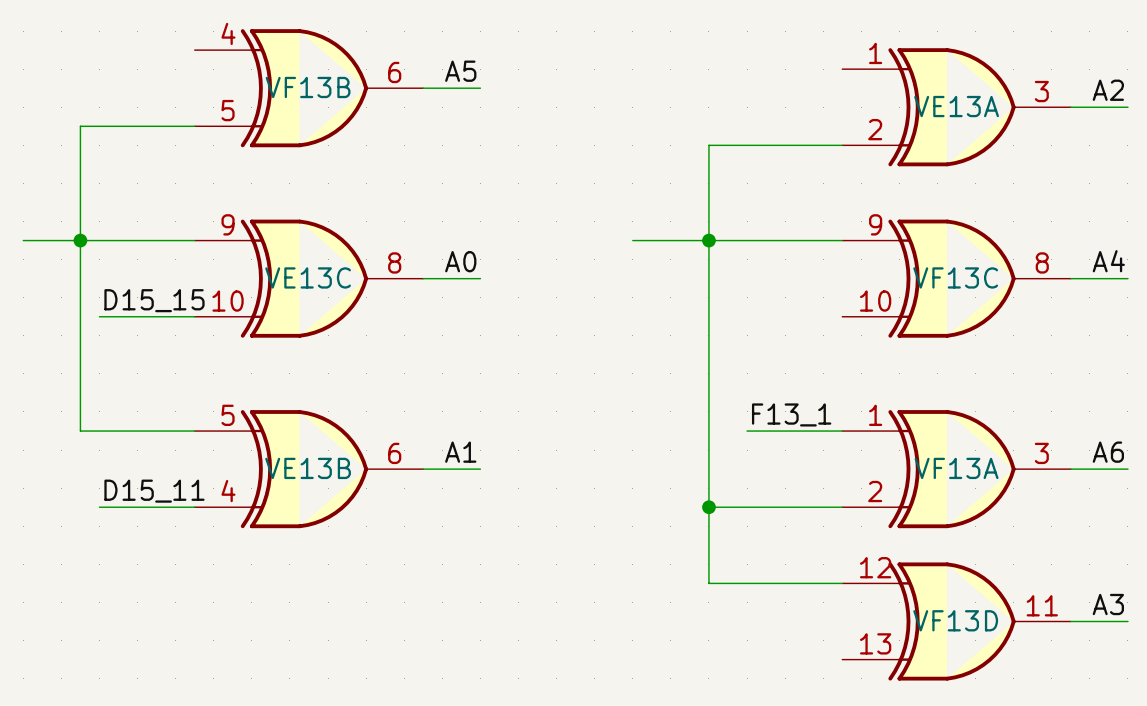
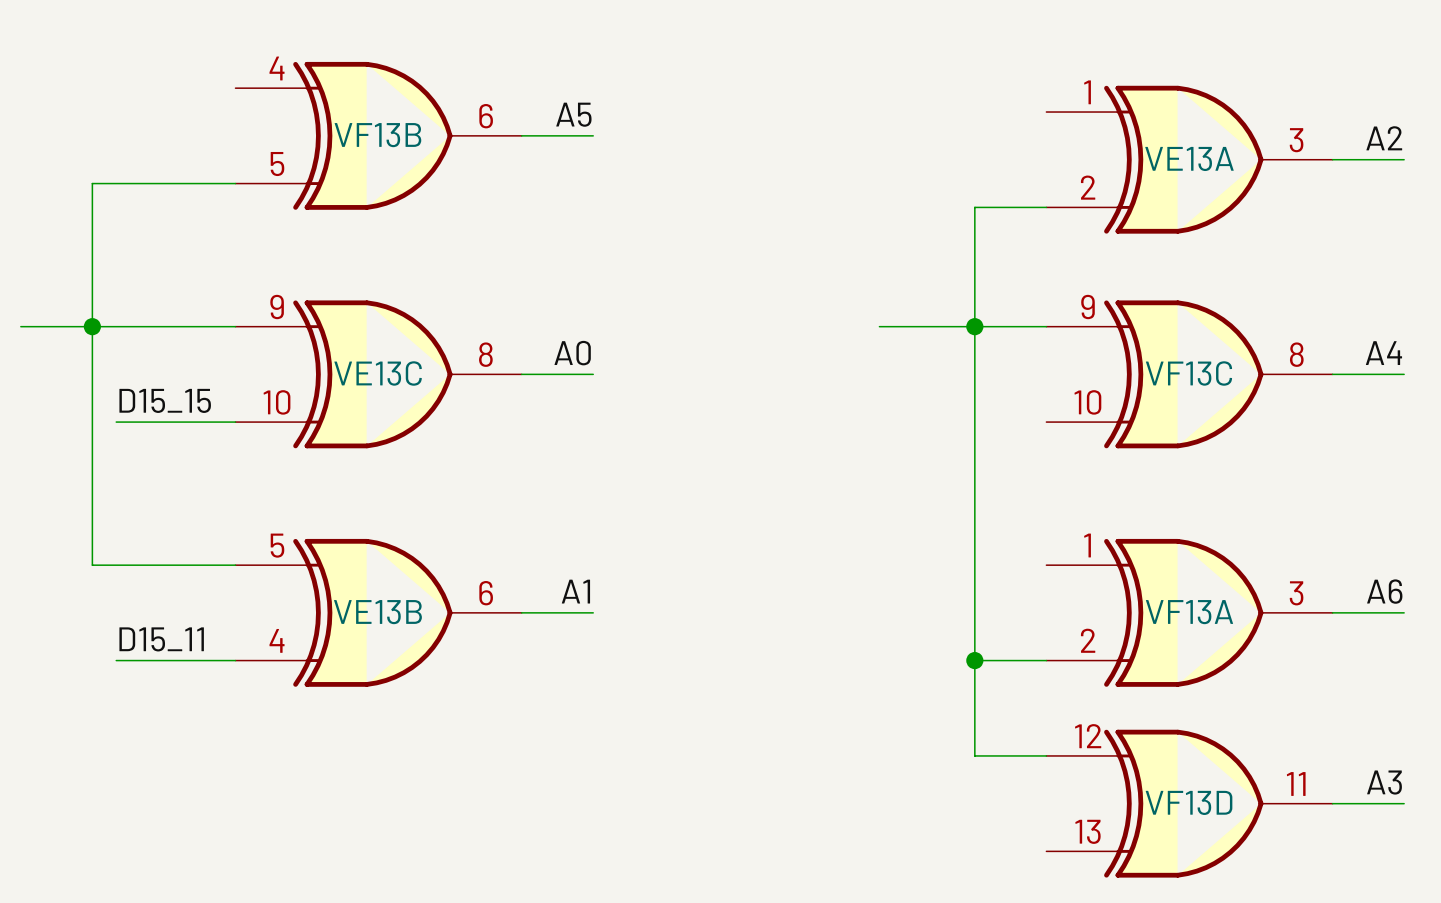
wire: (785, 145) (708, 145) (708, 583) (785, 583) -> (974, 207) (974, 755)
wire: (632, 240) (708, 240) -> none
junction position: (708, 240) -> (974, 326)
label: F13_1 (791, 414) -> none
wire: (747, 431) (842, 431) -> none
wire: (708, 507) (785, 507) -> none
junction position: (708, 507) -> (974, 660)

